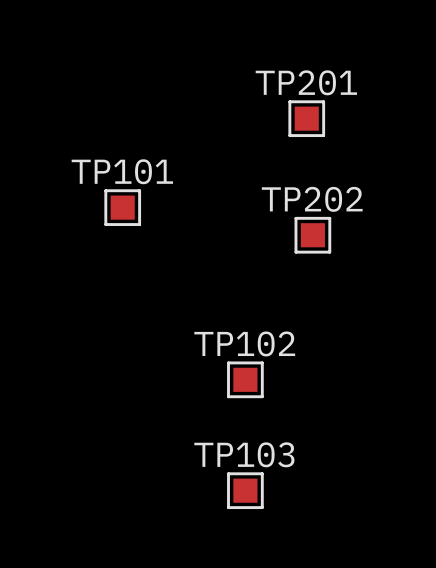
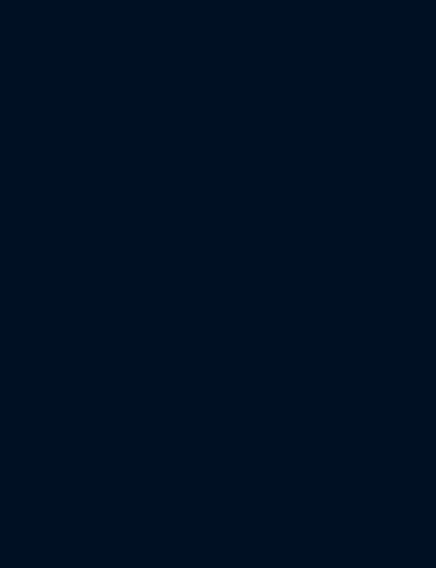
TP201: (306, 118) -> none
TP101: (122, 207) -> none
TP202: (312, 235) -> none
TP102: (245, 379) -> none
TP103: (245, 490) -> none

